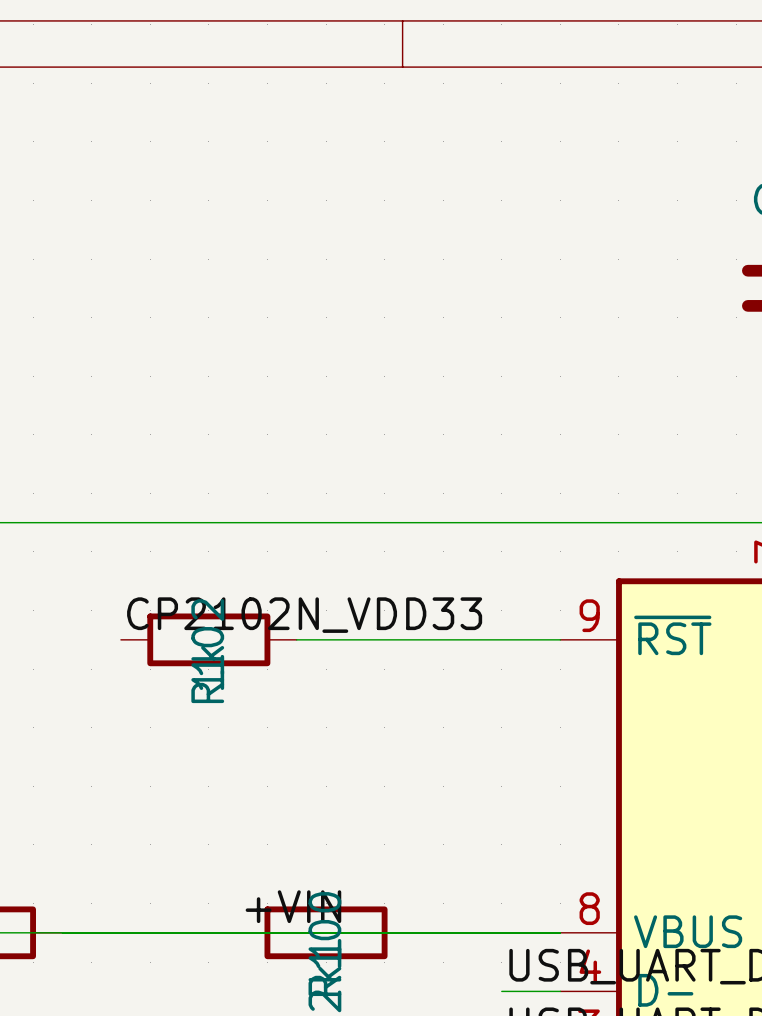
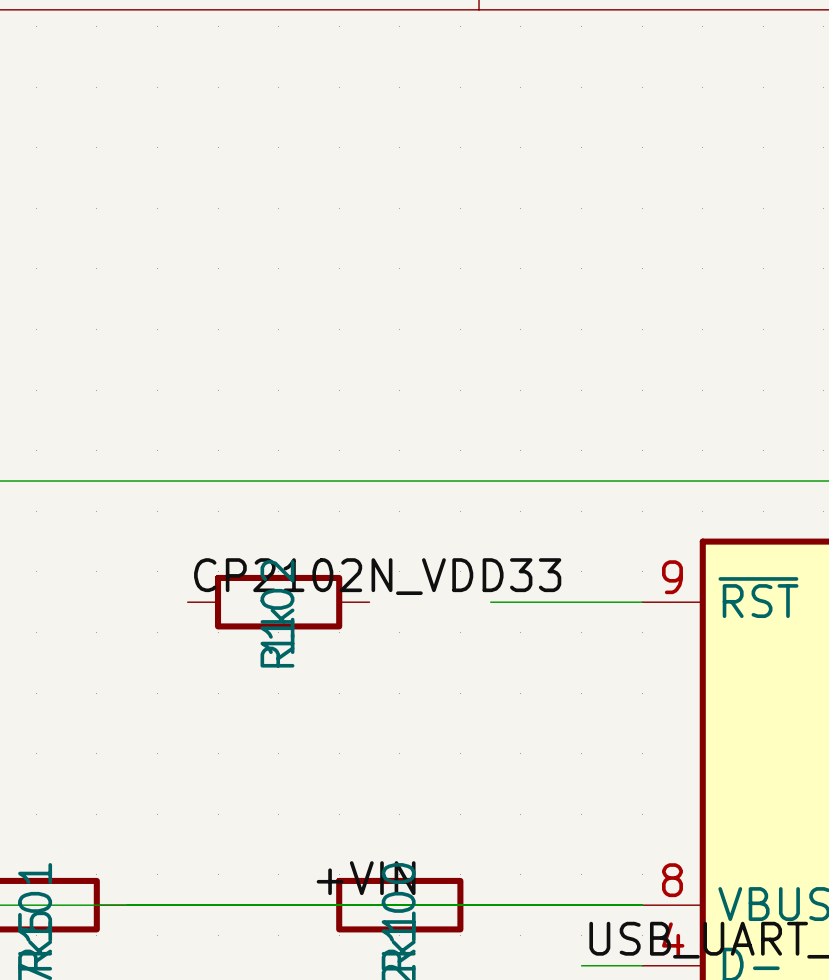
wire: (296, 639) (413, 639) -> none

